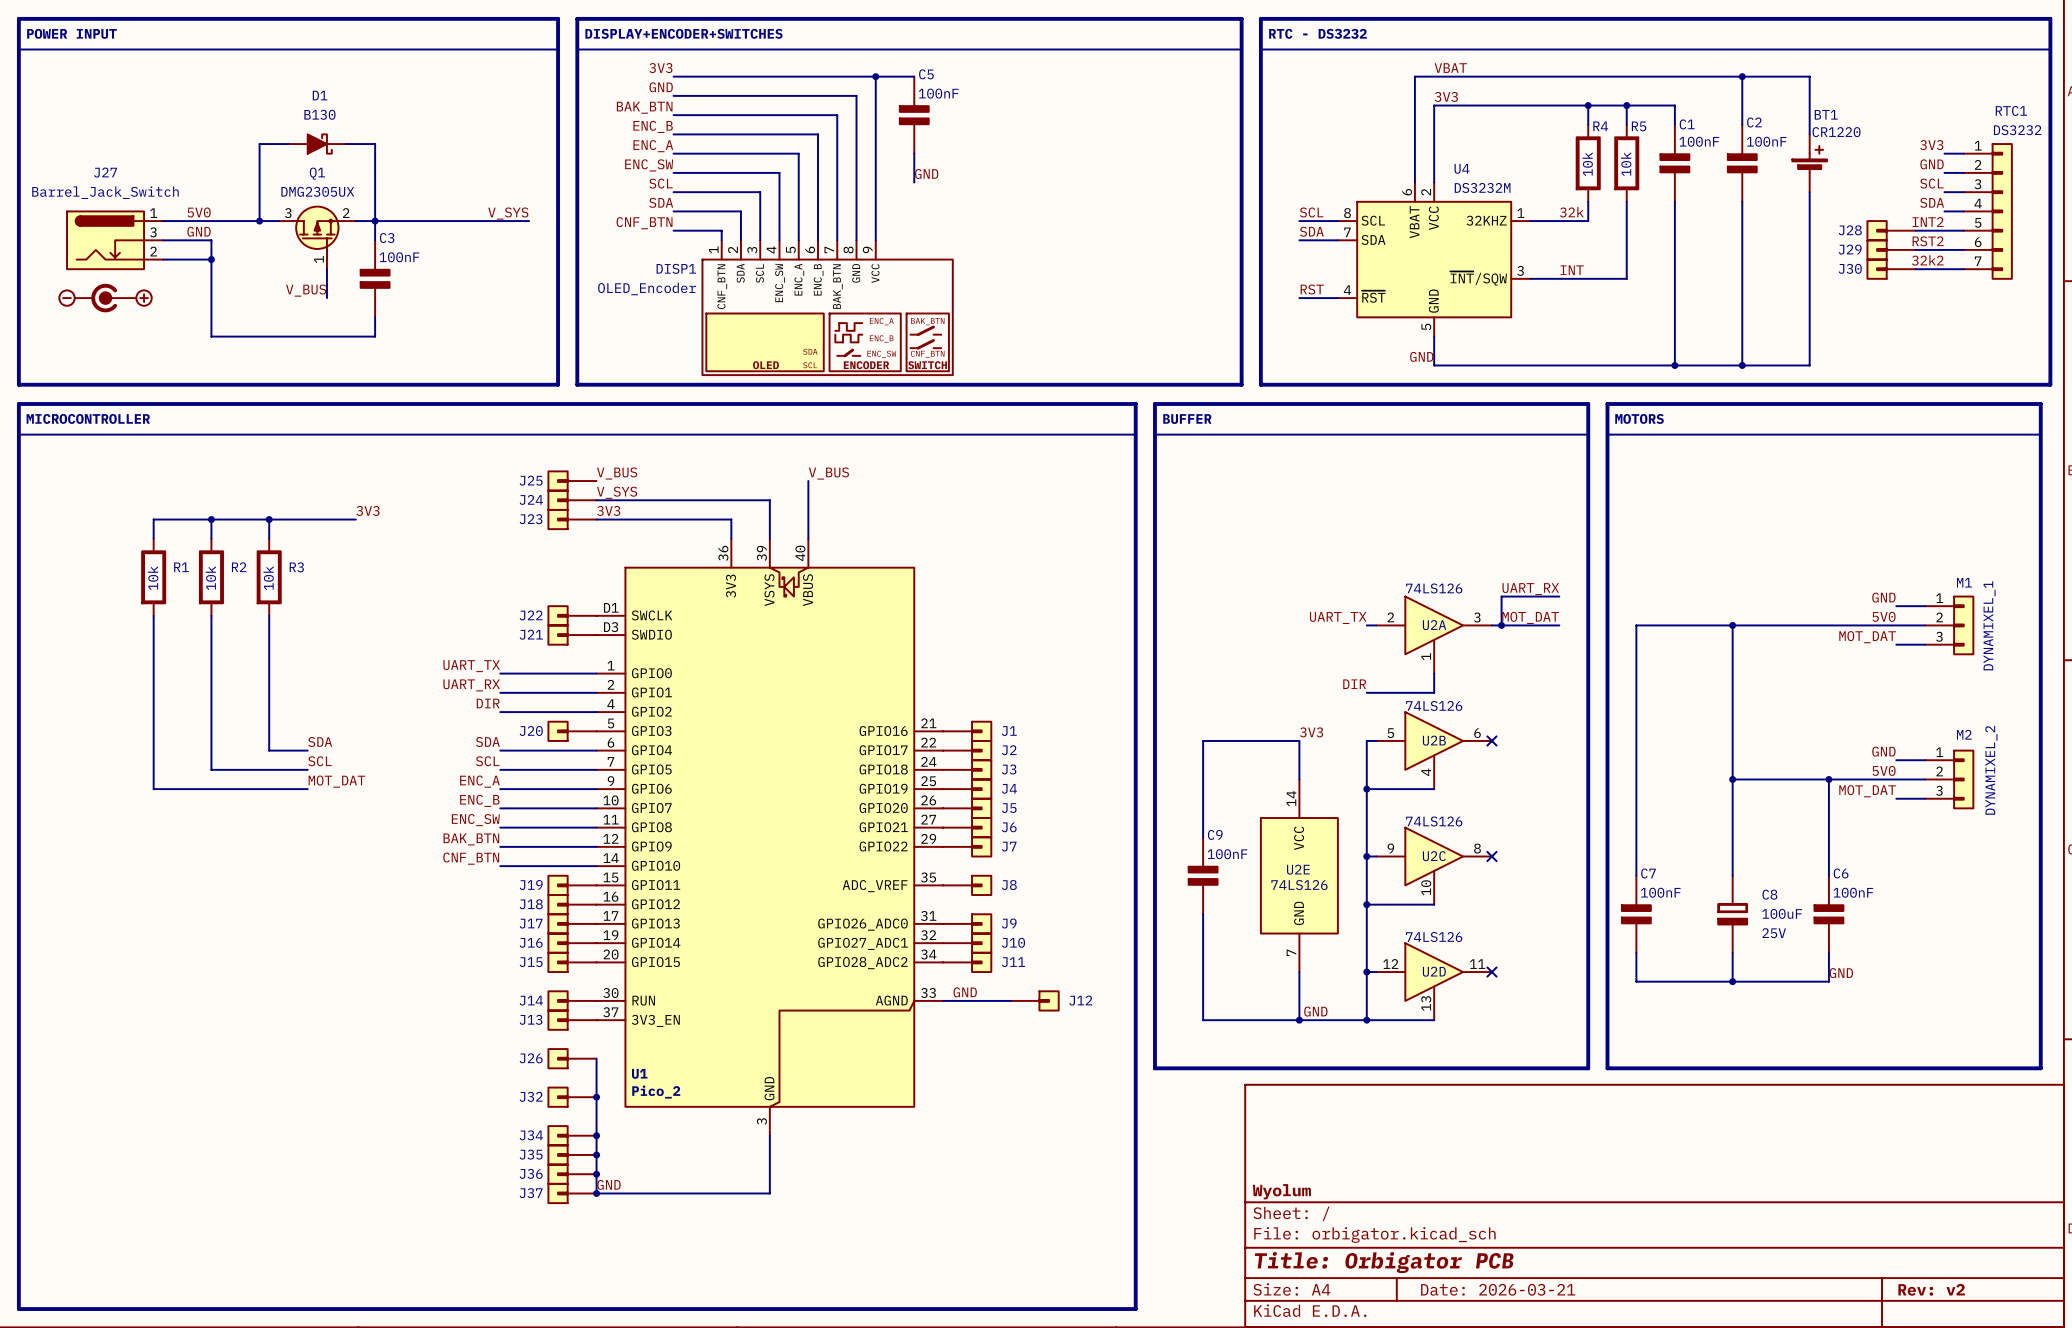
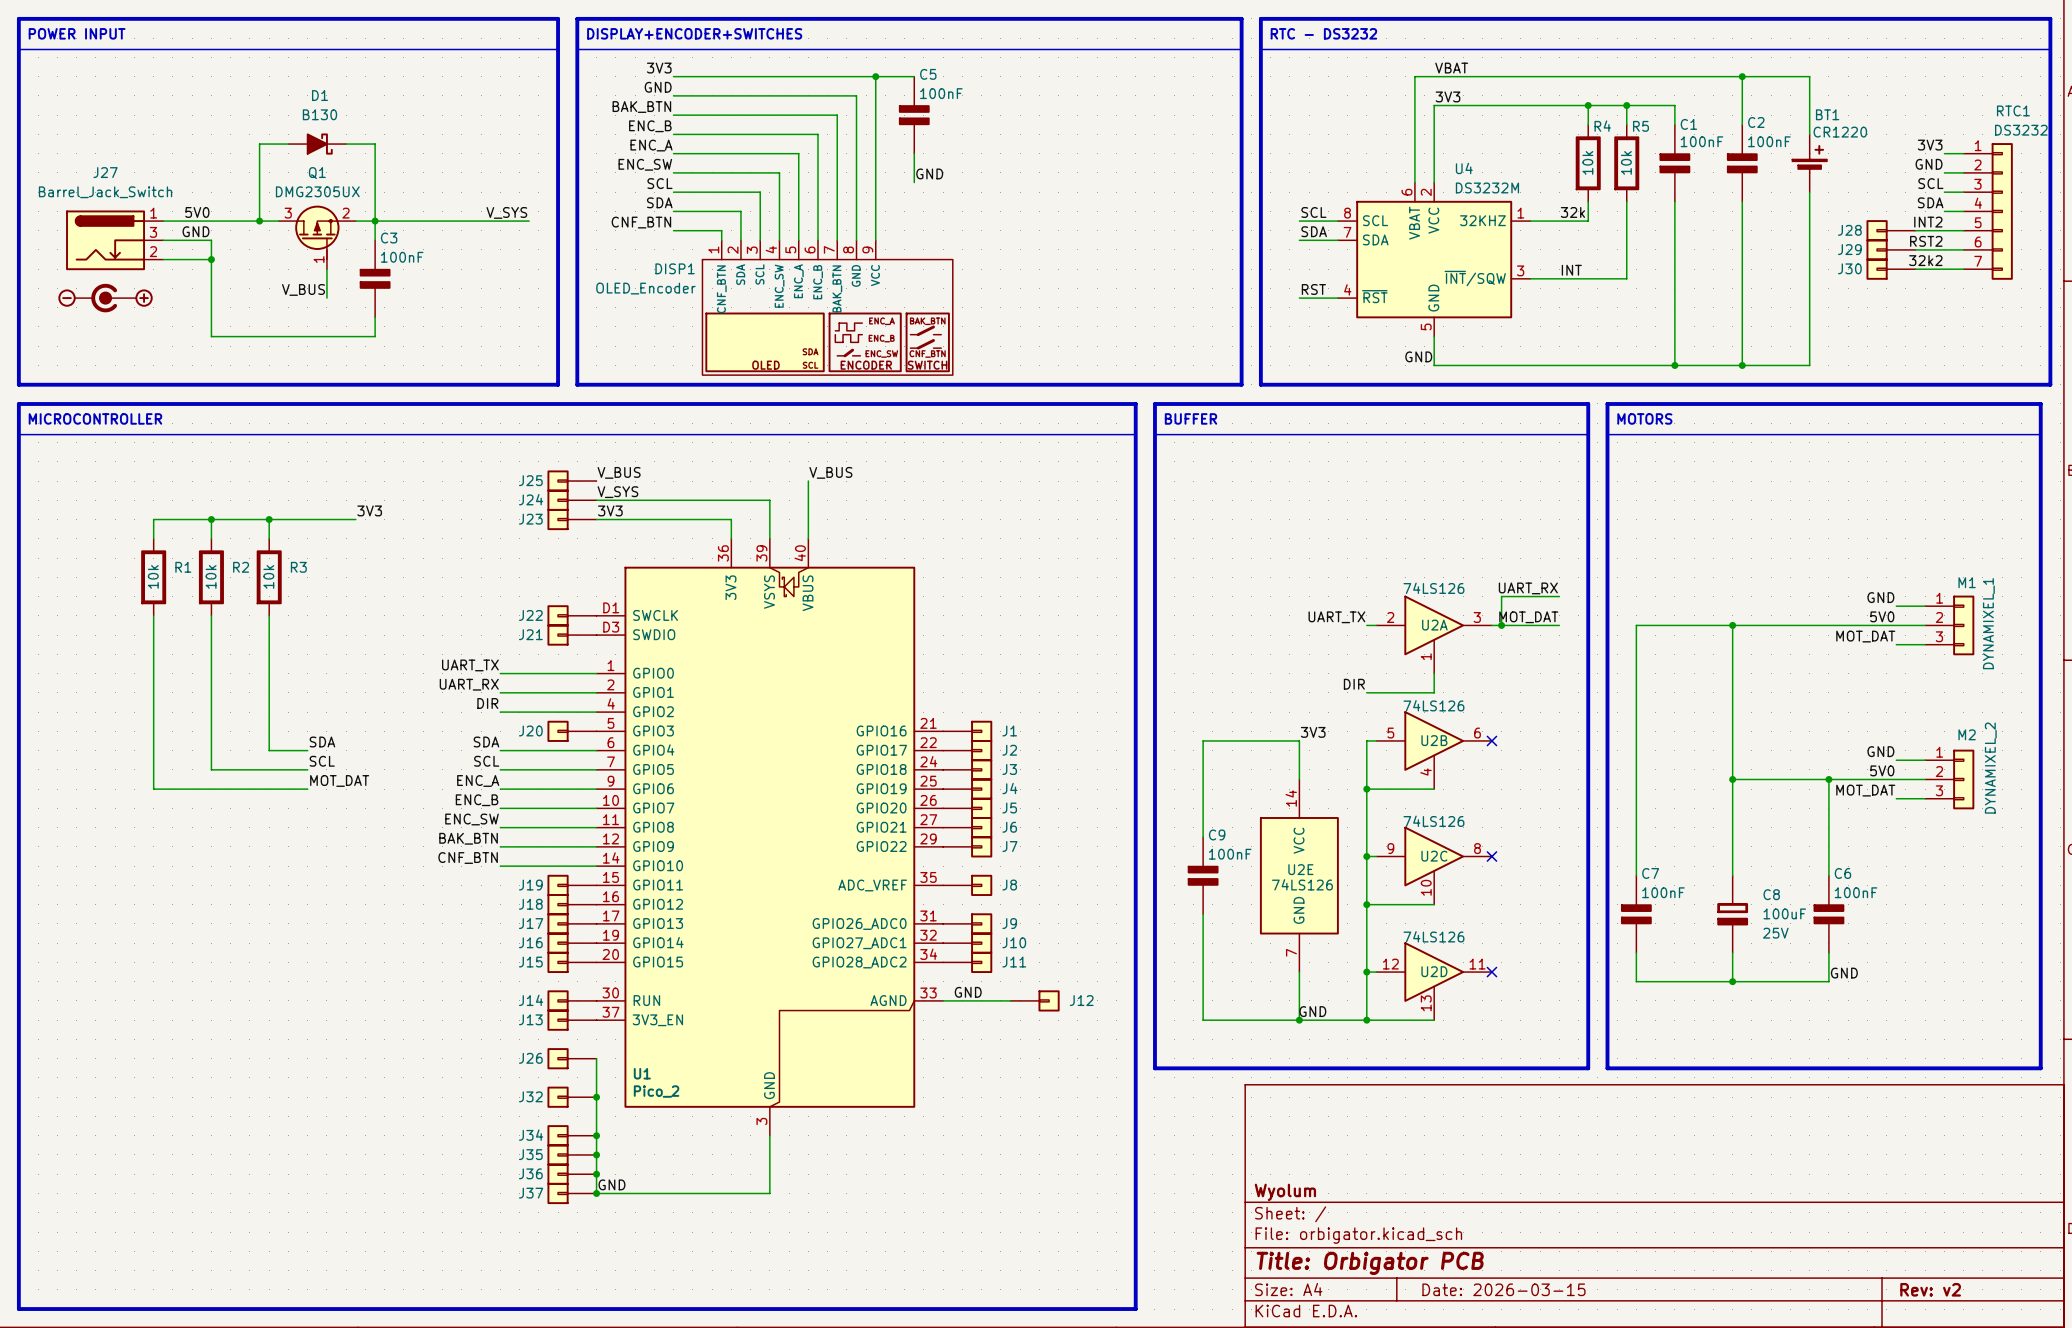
title block: Date: 2026-03-21 (1498, 1289) -> Date: 2026-03-15 (1503, 1289)

